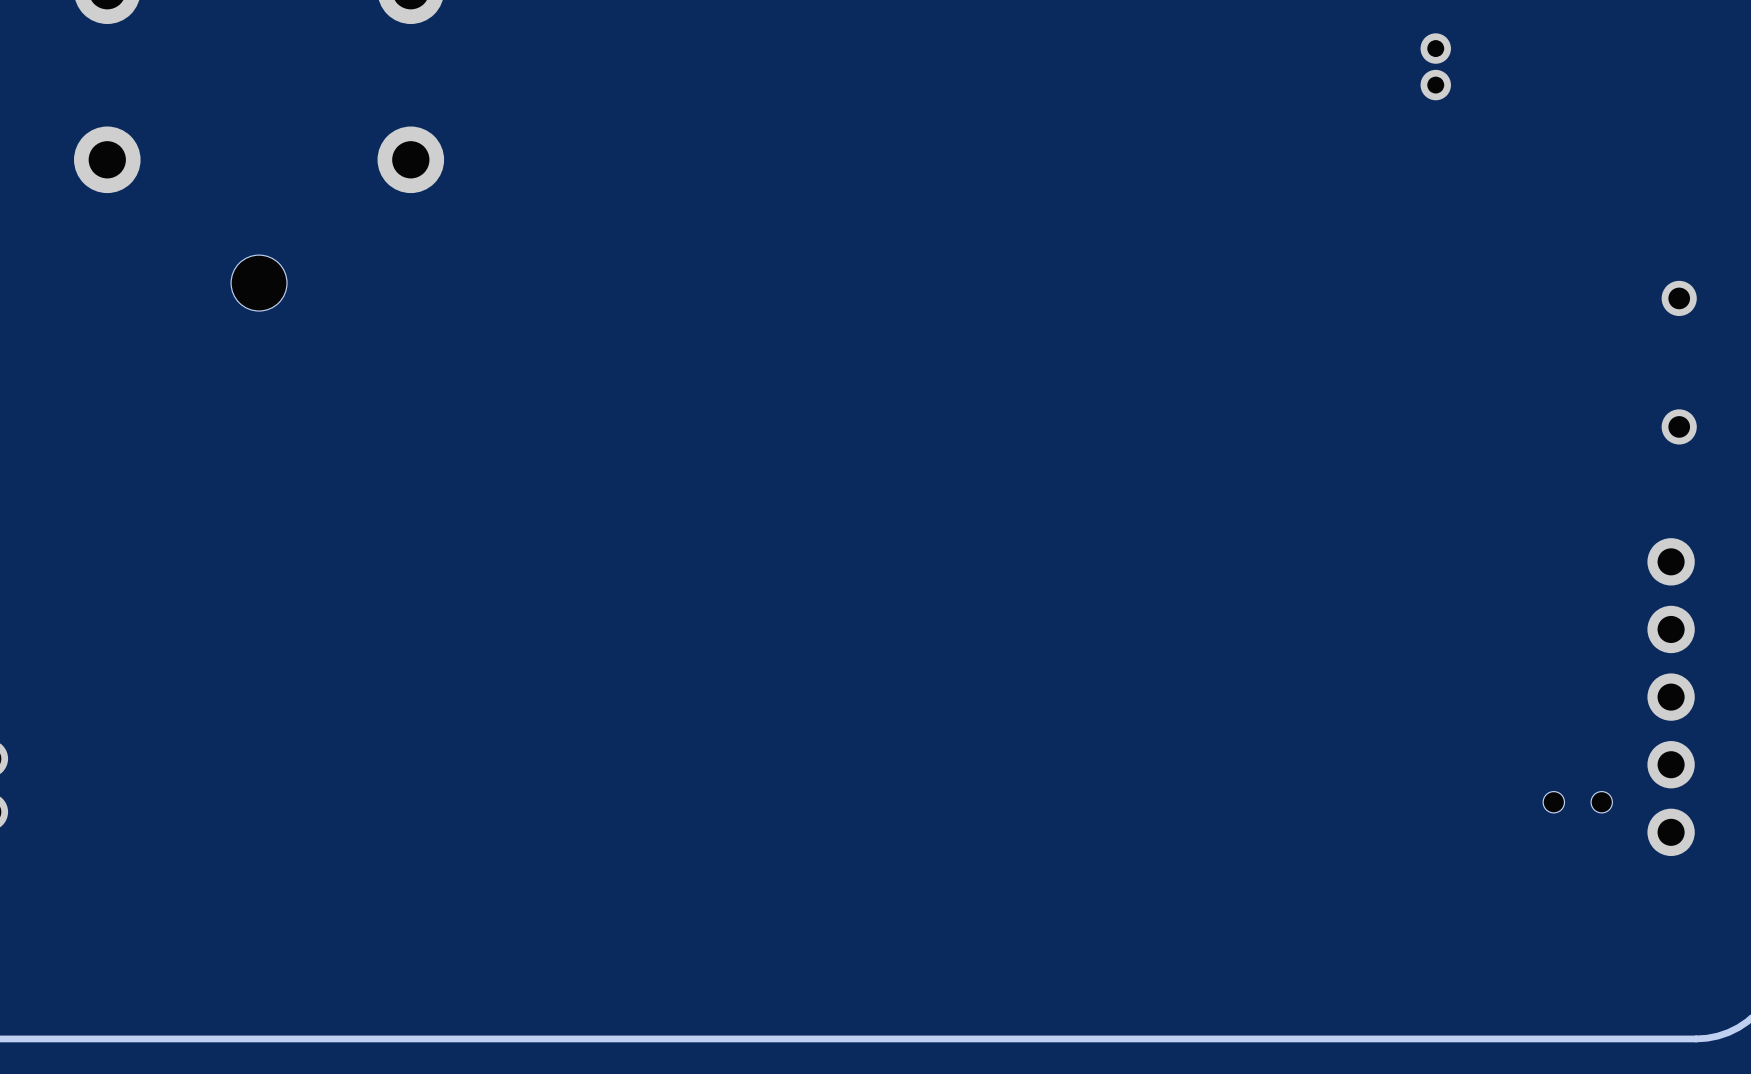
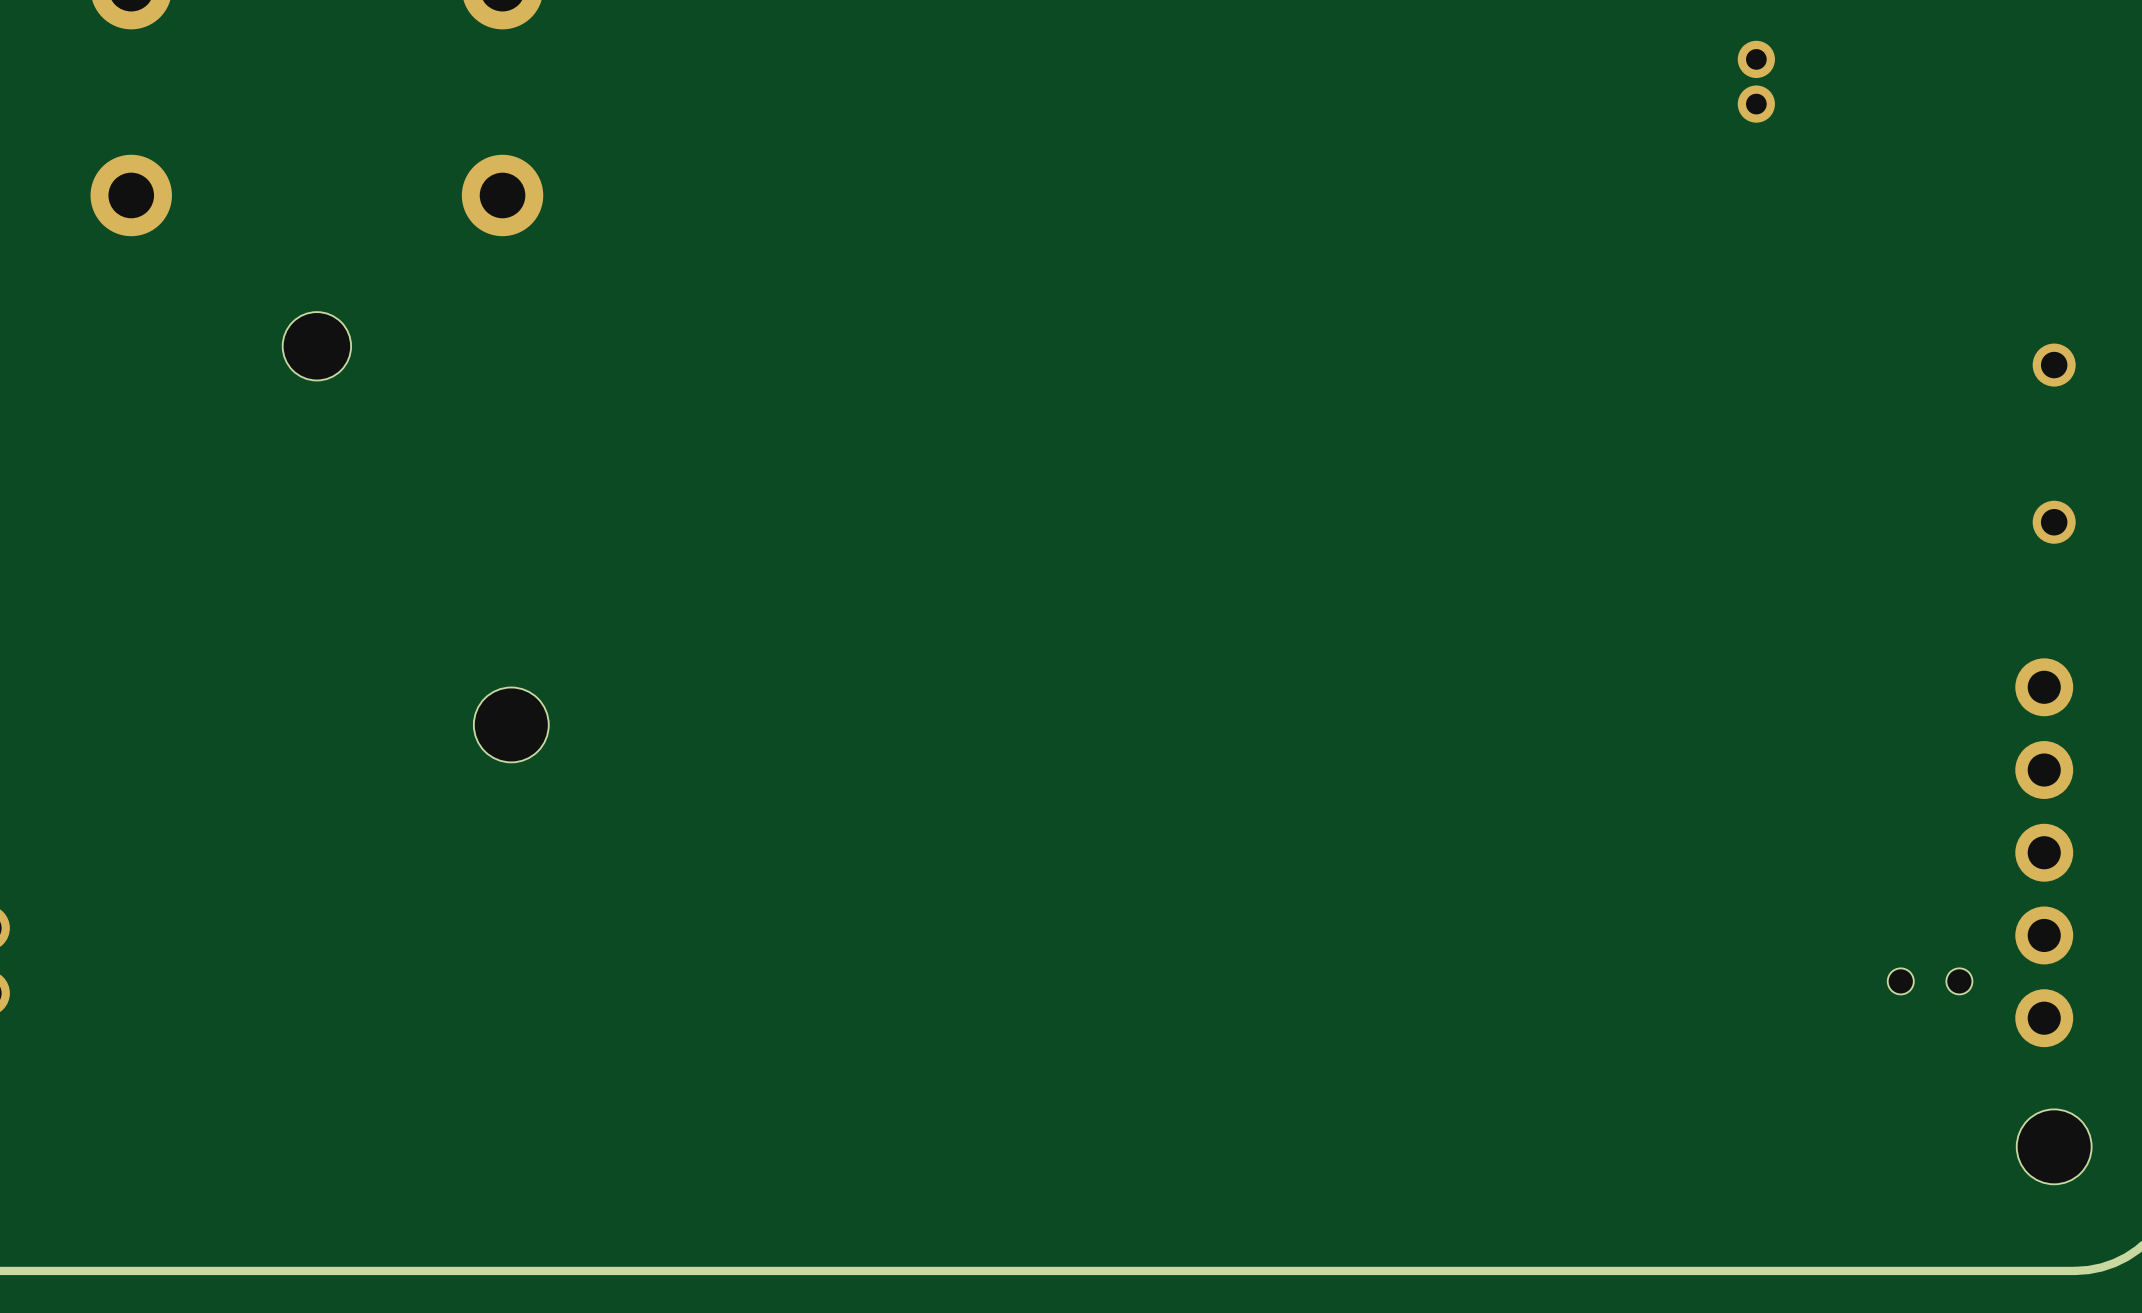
hole: none -> (511, 724)
hole: none -> (2054, 1146)

